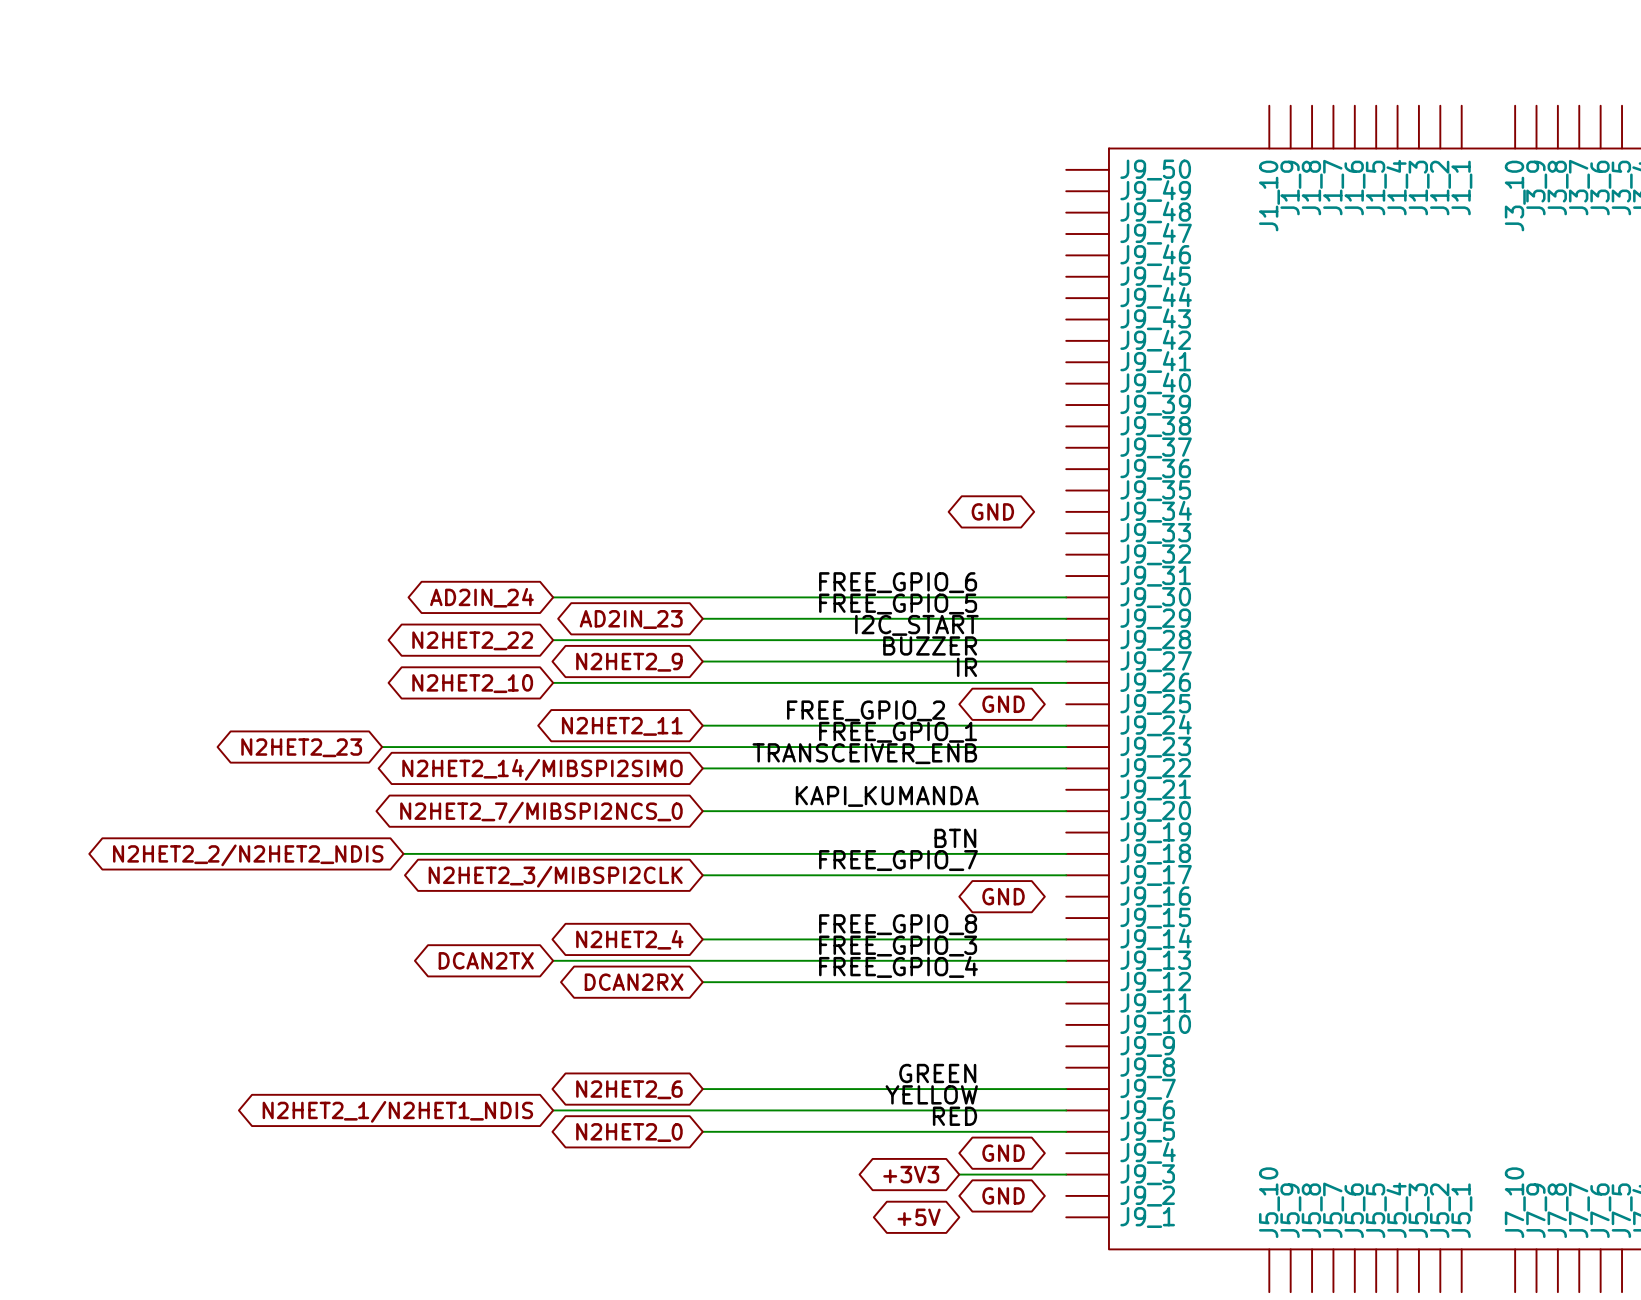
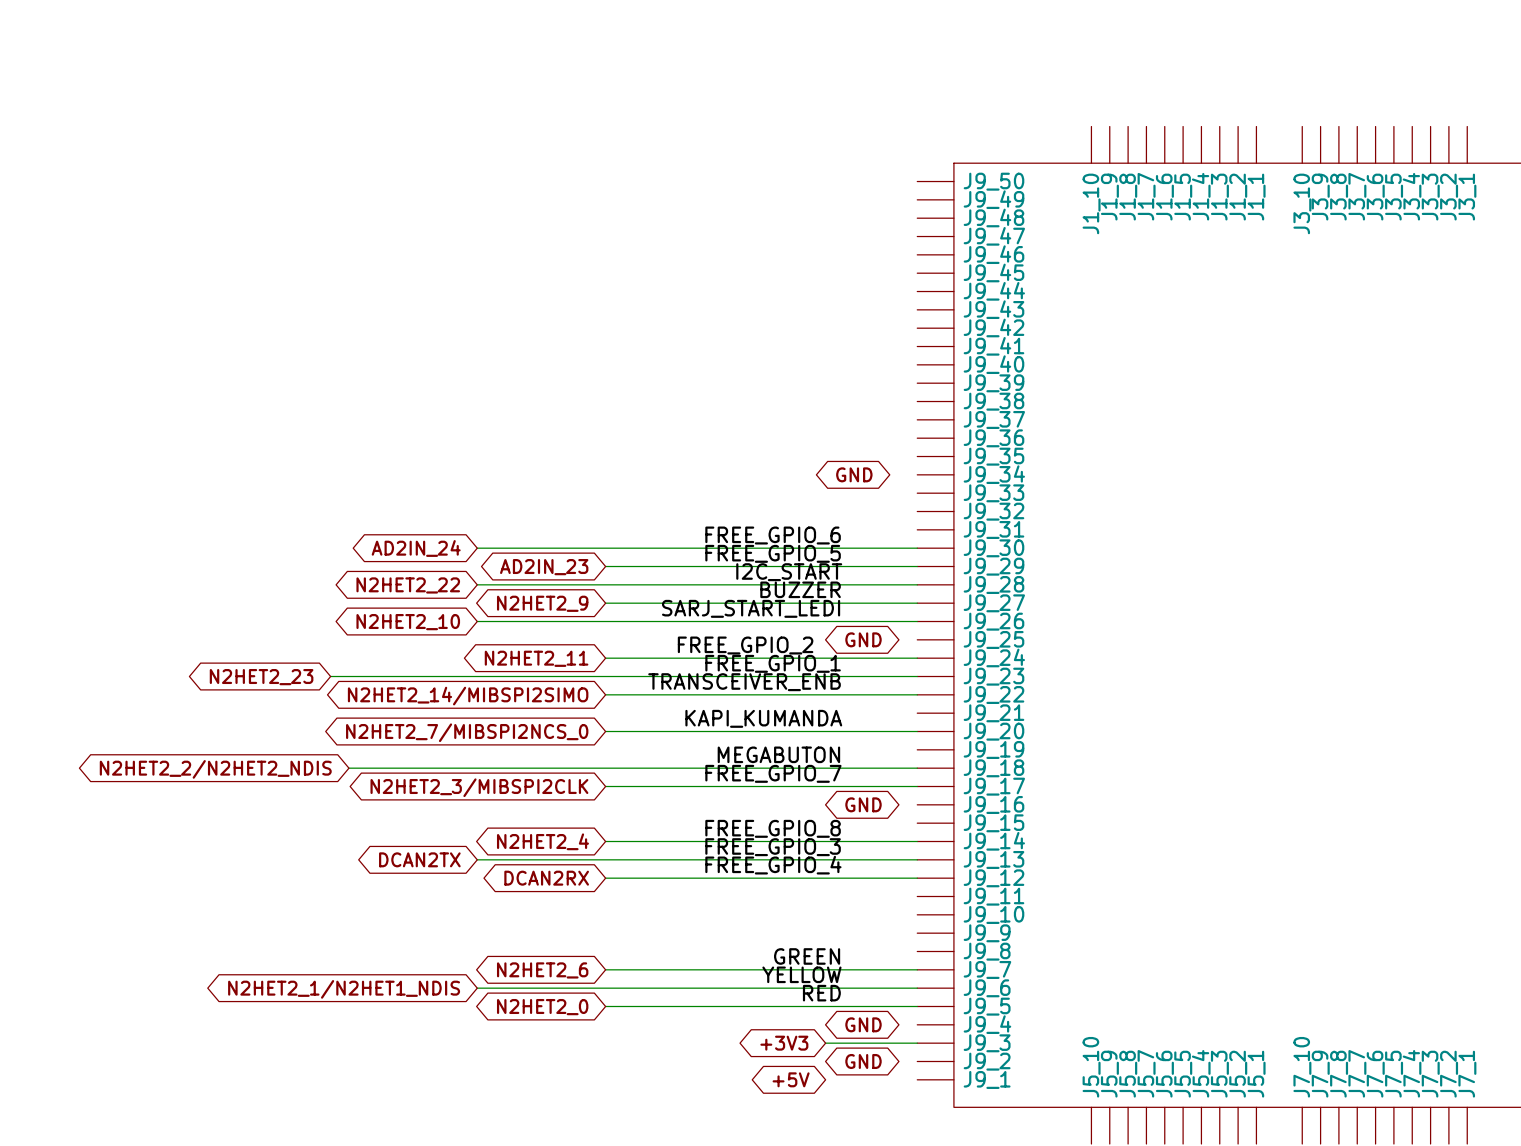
label: IR (967, 667) -> SARJ_START_LEDI (751, 608)
label: BTN (955, 838) -> MEGABUTON (778, 754)

